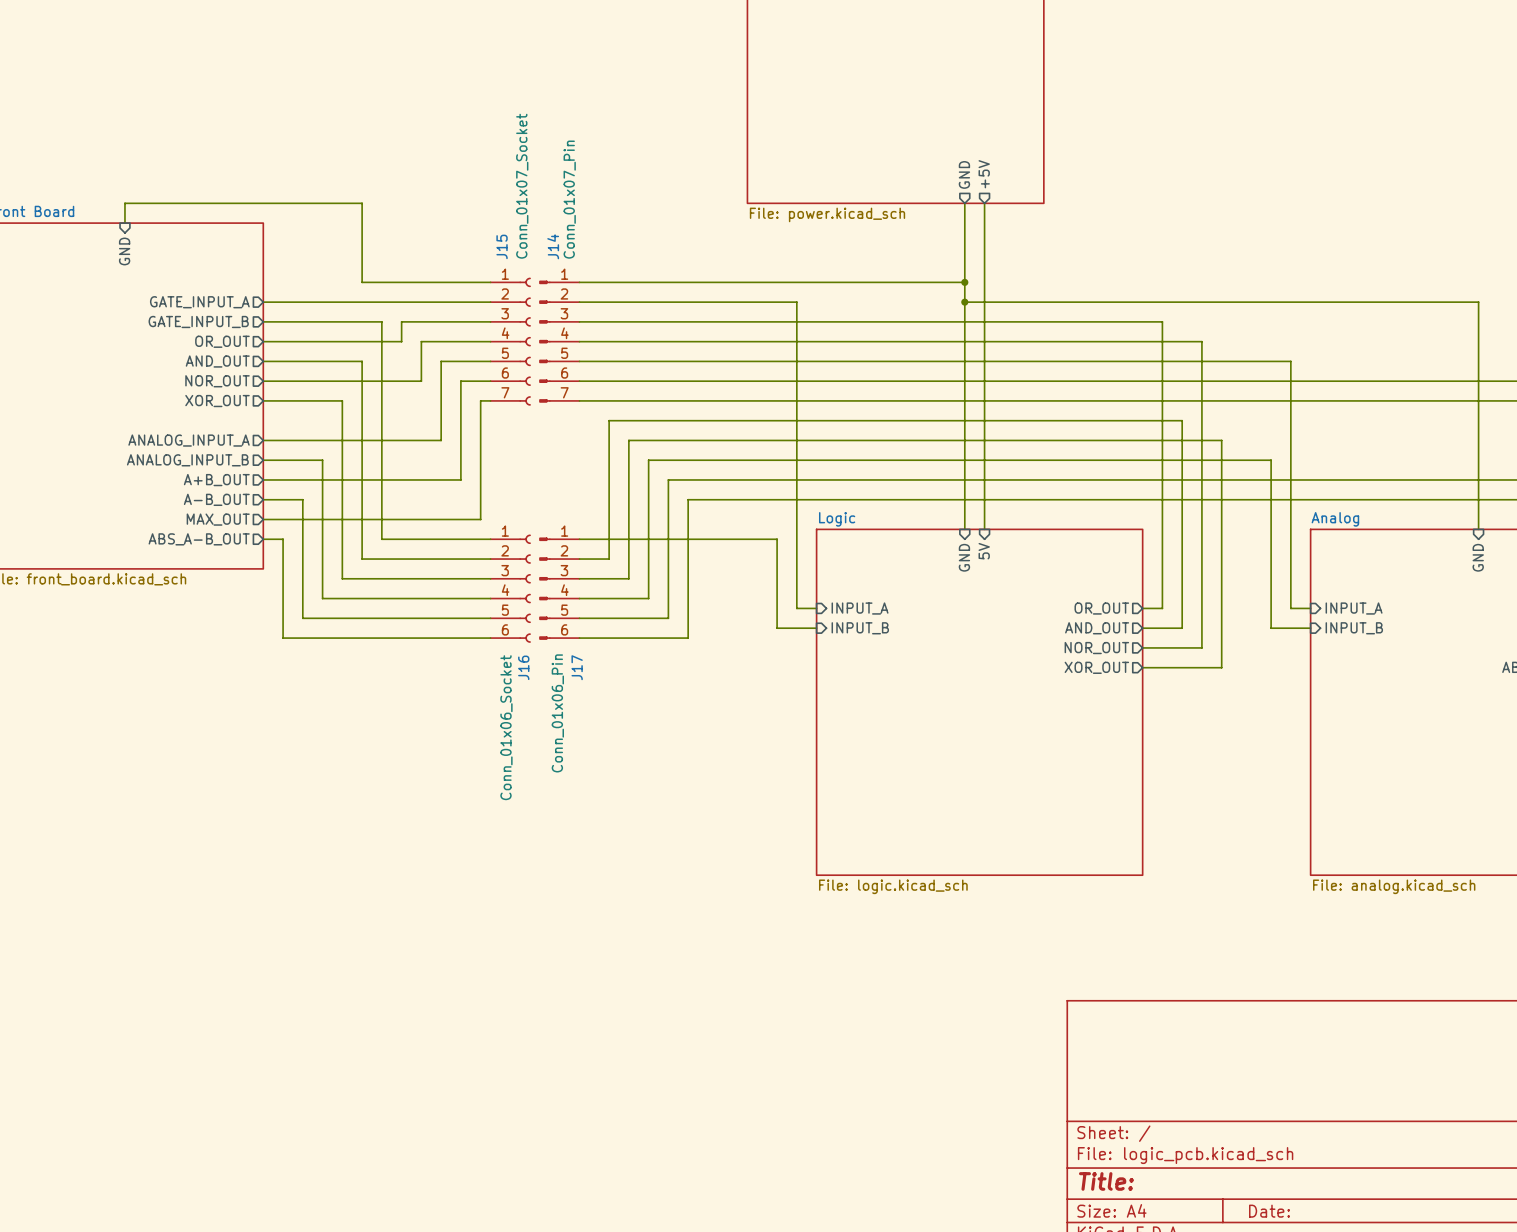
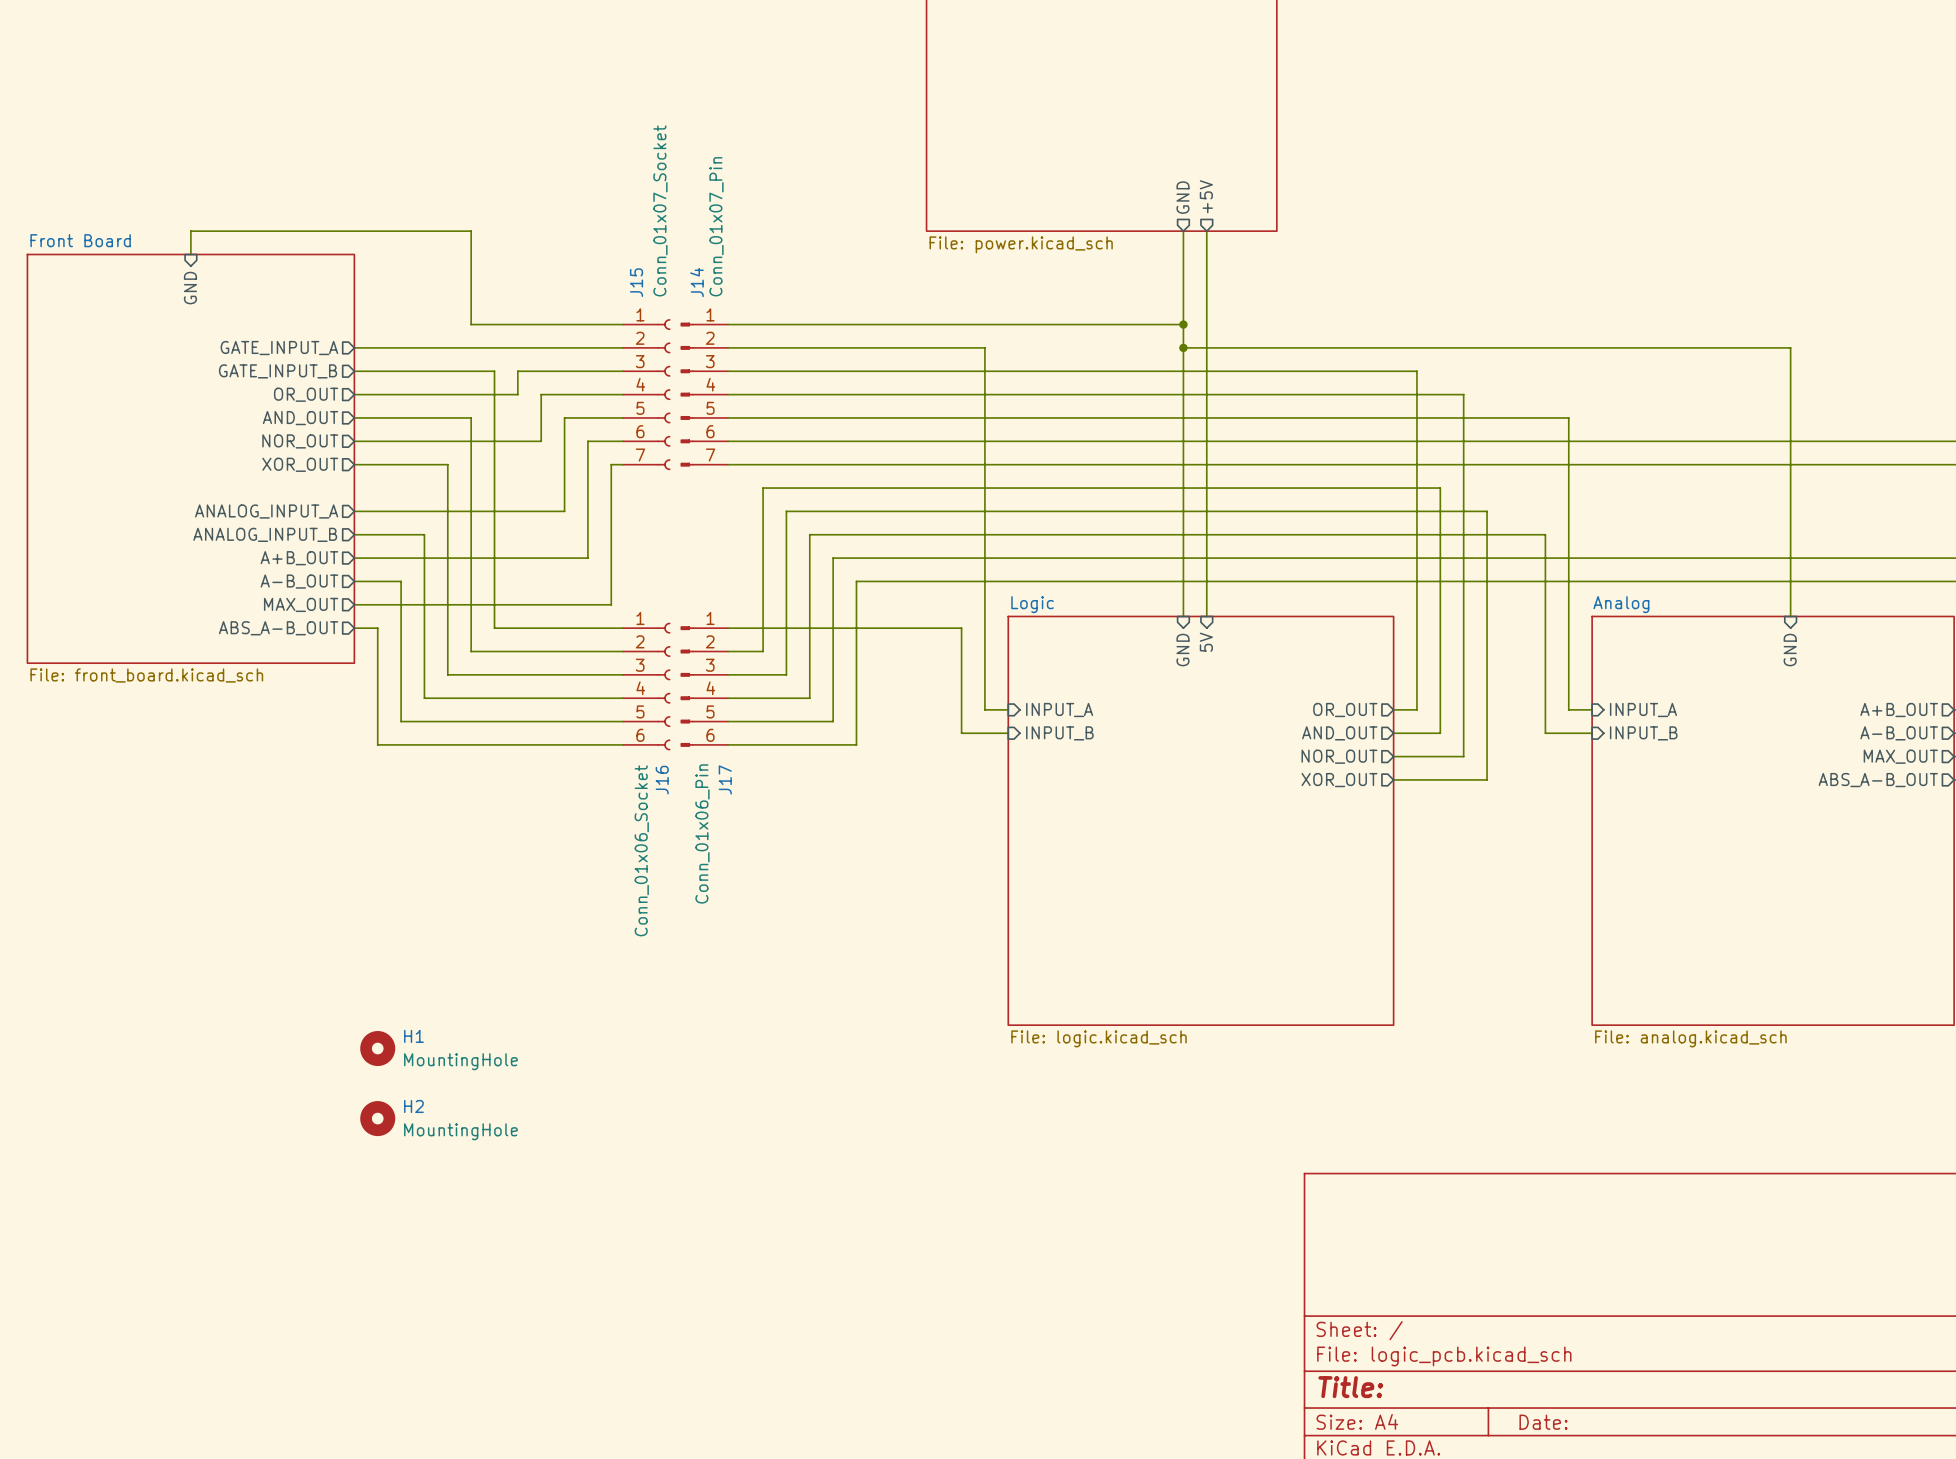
H1: none -> MountingHole (377, 1048)
H2: none -> MountingHole (377, 1118)

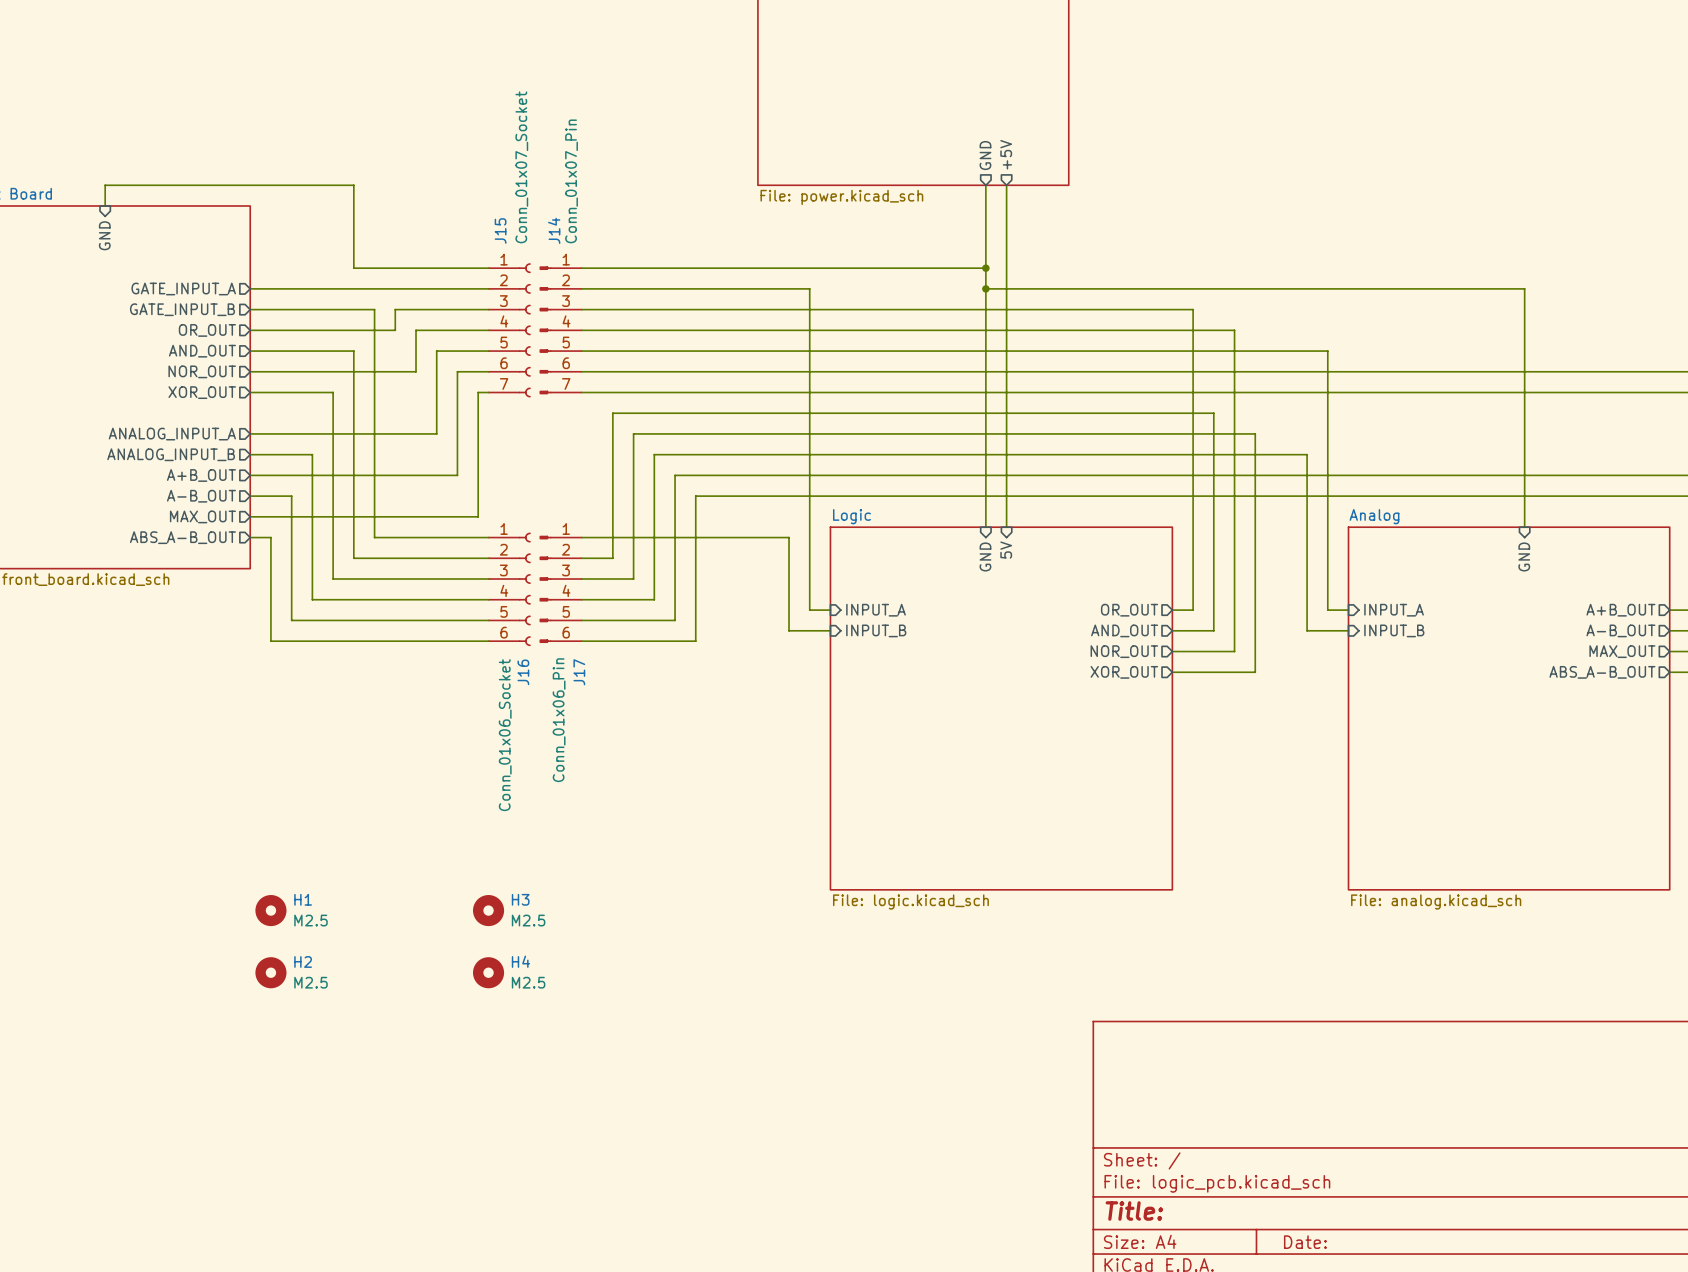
H3: none -> M2.5 (488, 910)
H1 value: MountingHole (460, 1061) -> M2.5 (310, 920)
H4: none -> M2.5 (488, 972)
H2 value: MountingHole (460, 1131) -> M2.5 (310, 982)

